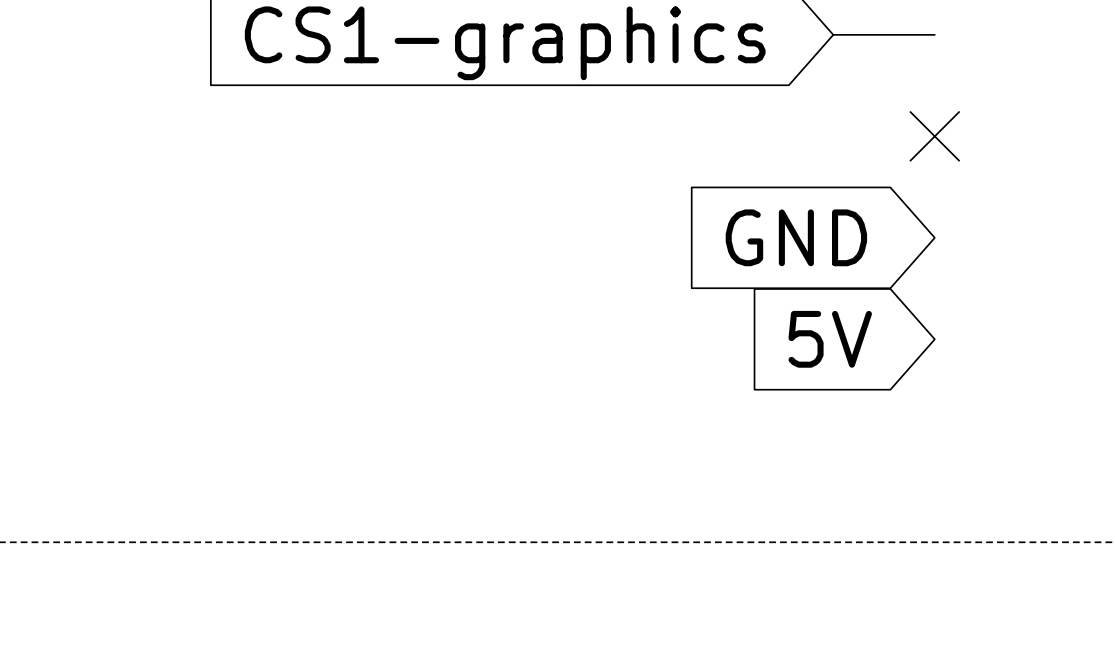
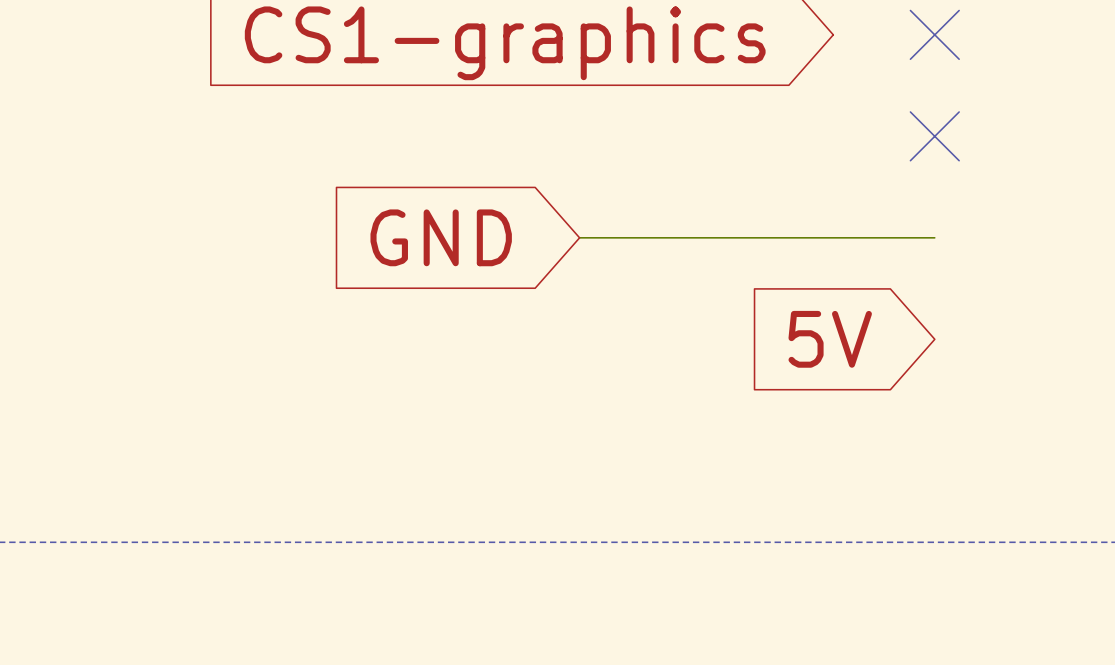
wire: (833, 34) (934, 34) -> none
no-connect mark: none -> (934, 34)
wire: none -> (579, 237) (934, 237)
global label position: GND (796, 237) -> GND (441, 237)

